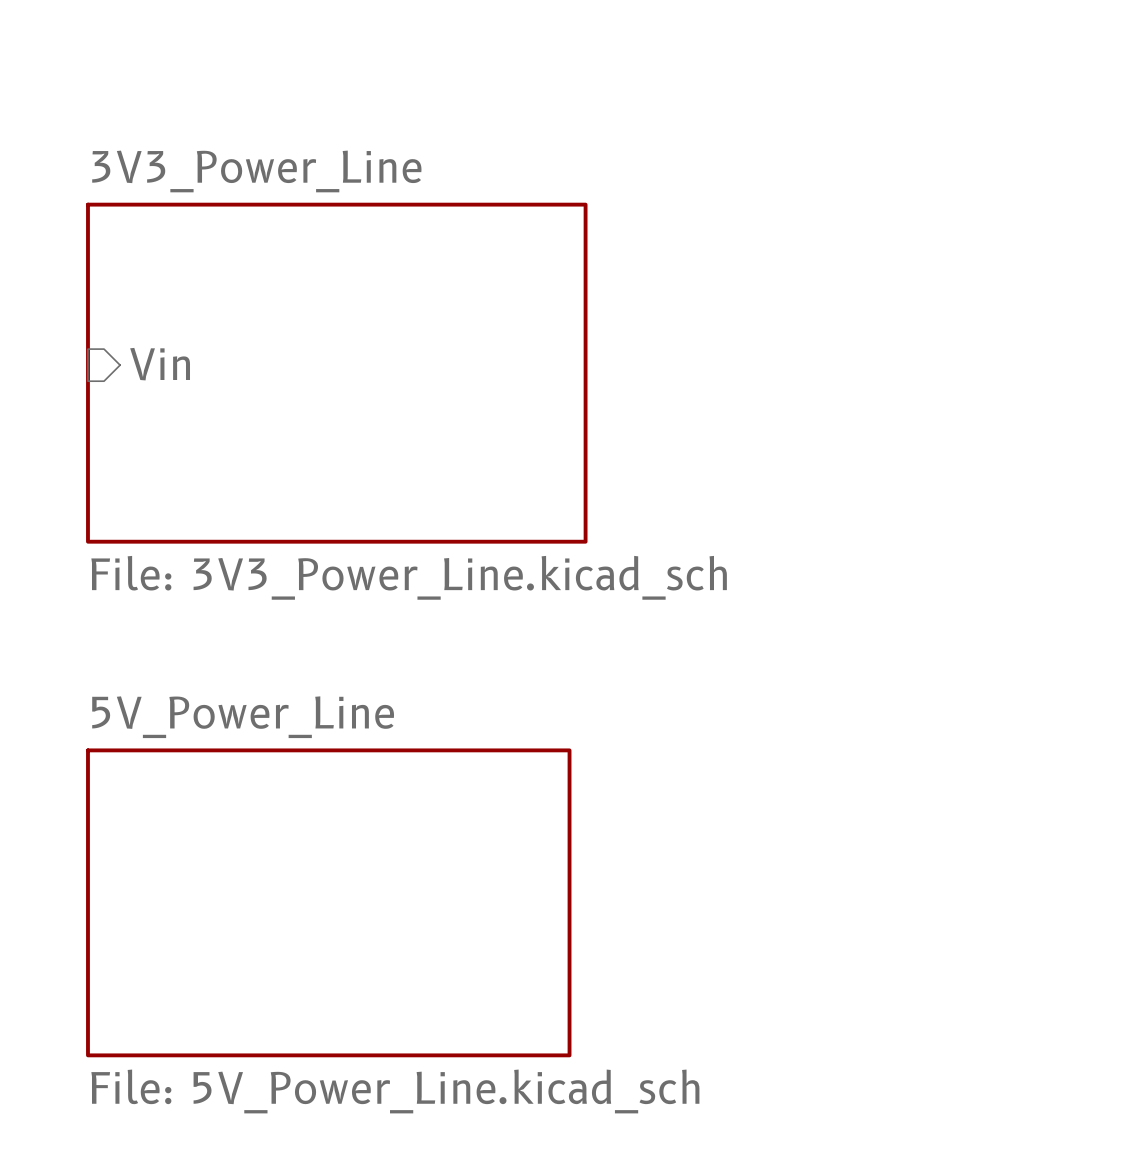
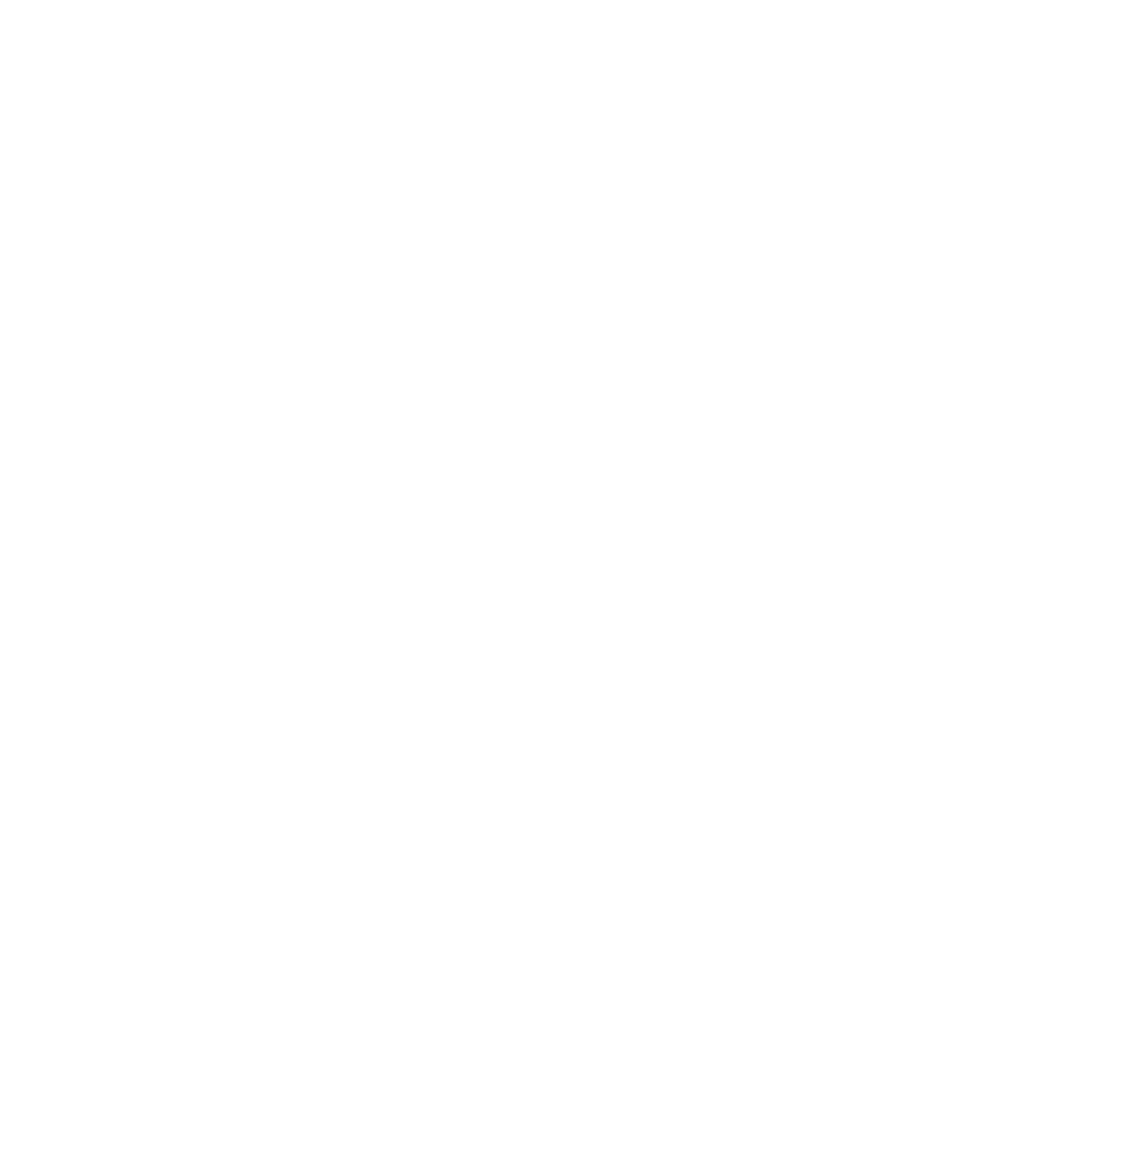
sheet pin: Vin (160, 364) -> none
sheet 3V3_Power_Line: File: 3V3_Power_Line.kicad_sch (336, 373) -> none
sheet 5V_Power_Line: File: 5V_Power_Line.kicad_sch (328, 902) -> none

